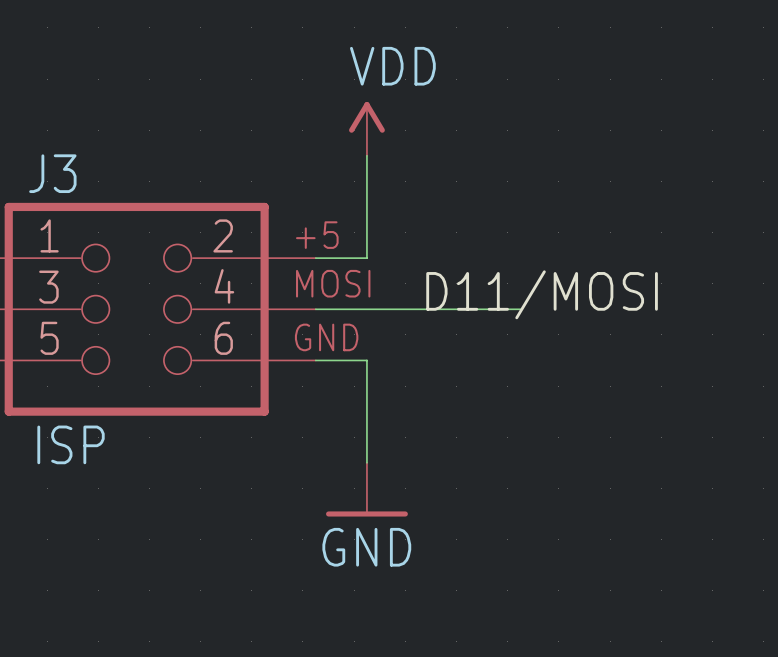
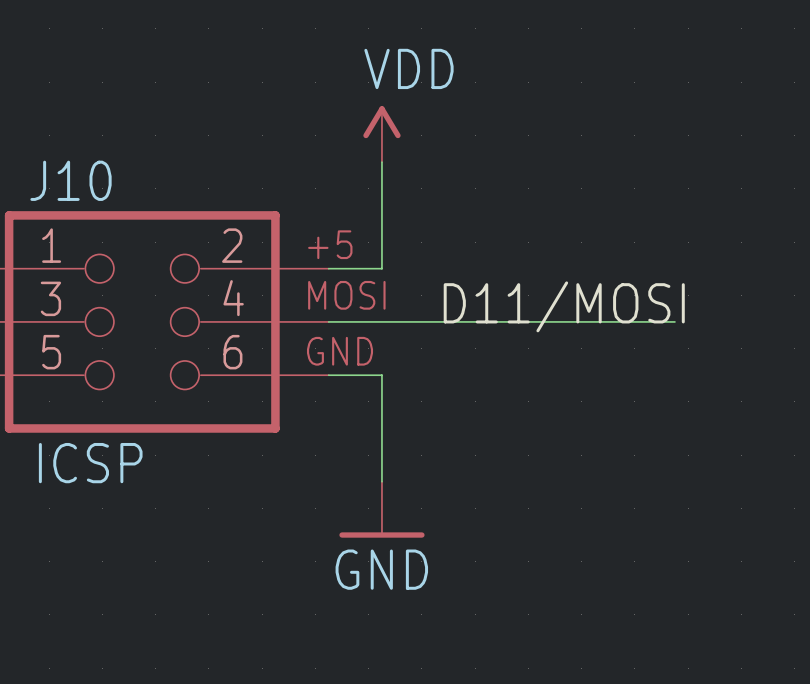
J3 name: J3 (52, 173) -> J10 (71, 180)
wire: none -> (541, 321) (674, 321)
J3 value: ISP (71, 444) -> ICSP (90, 463)

